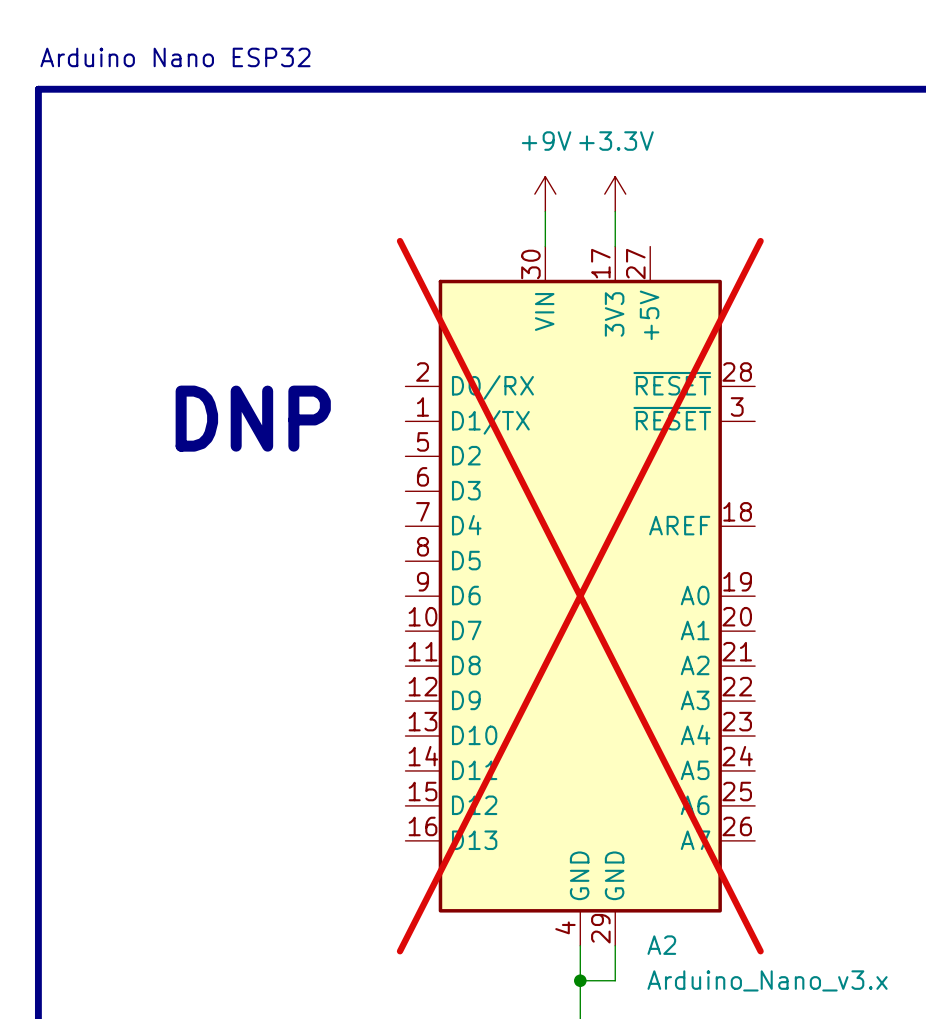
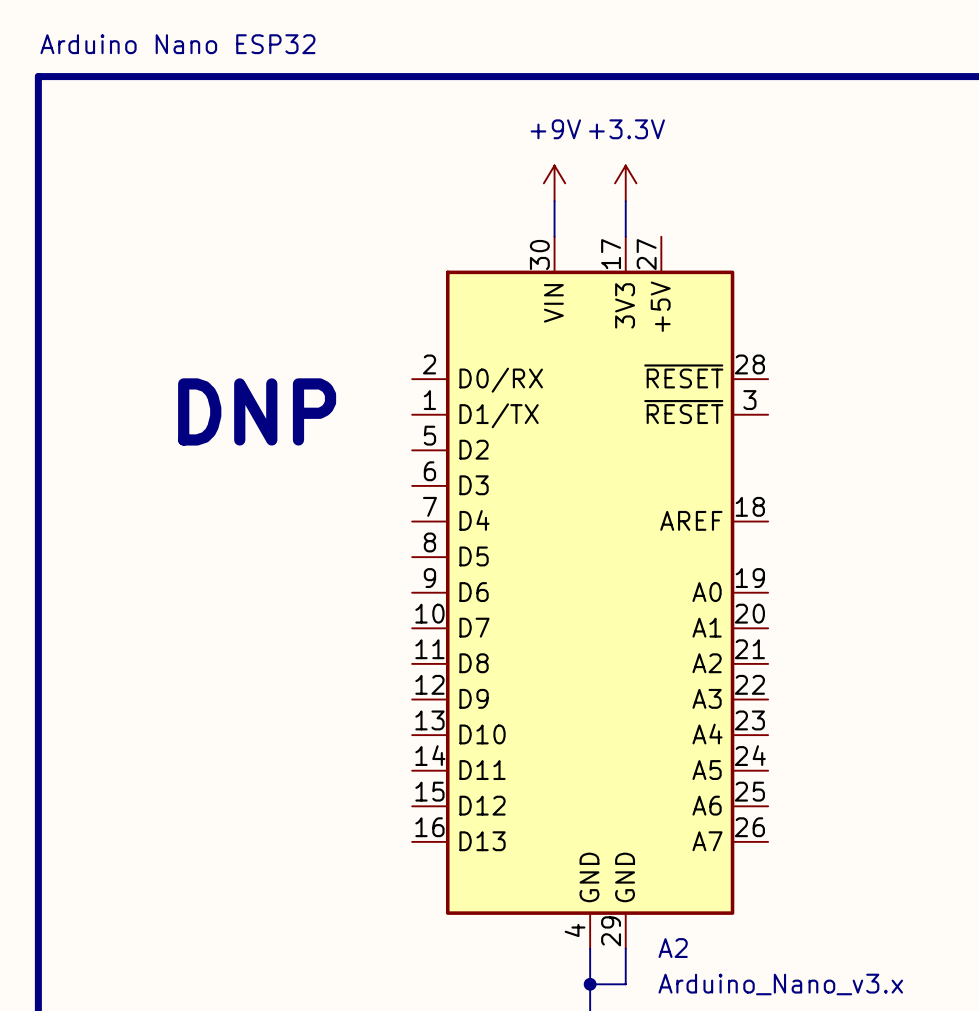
A2 do-not-place cross: (580, 596) -> none

